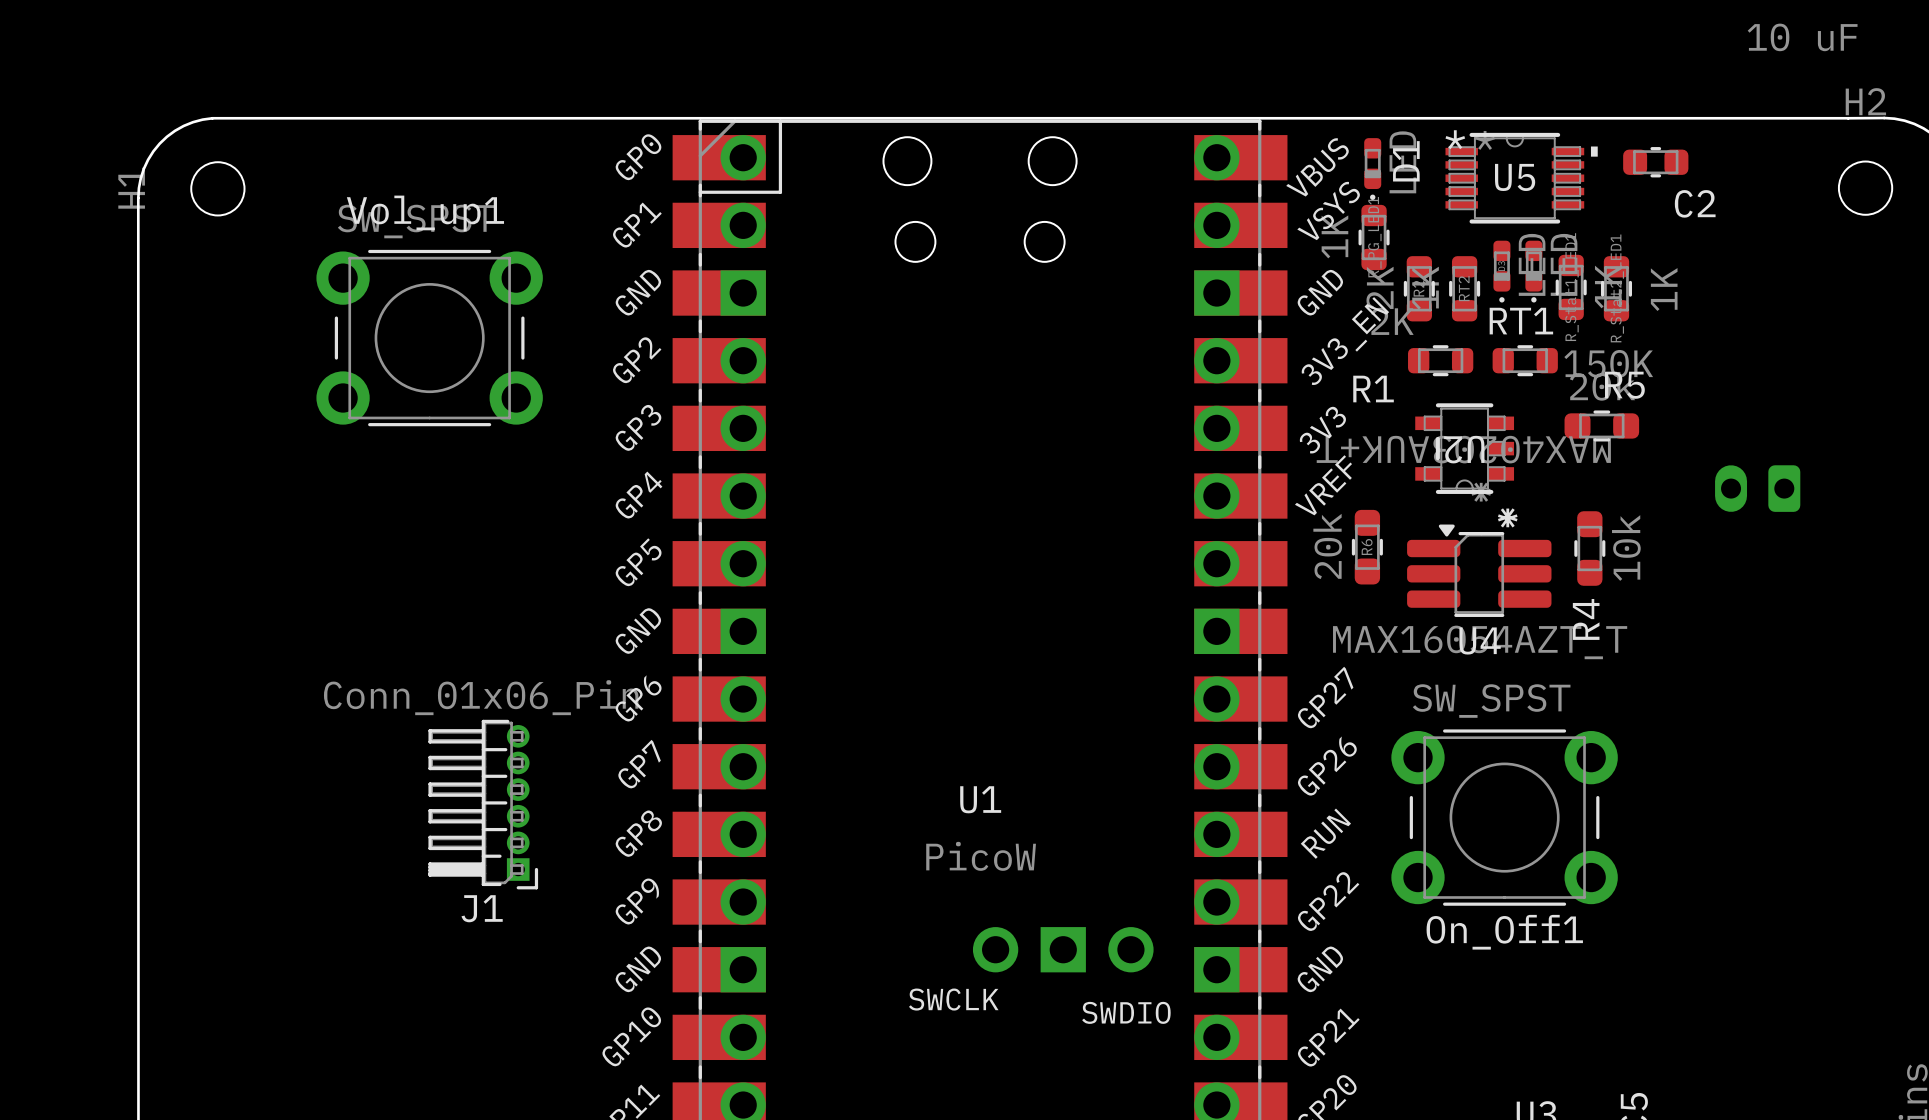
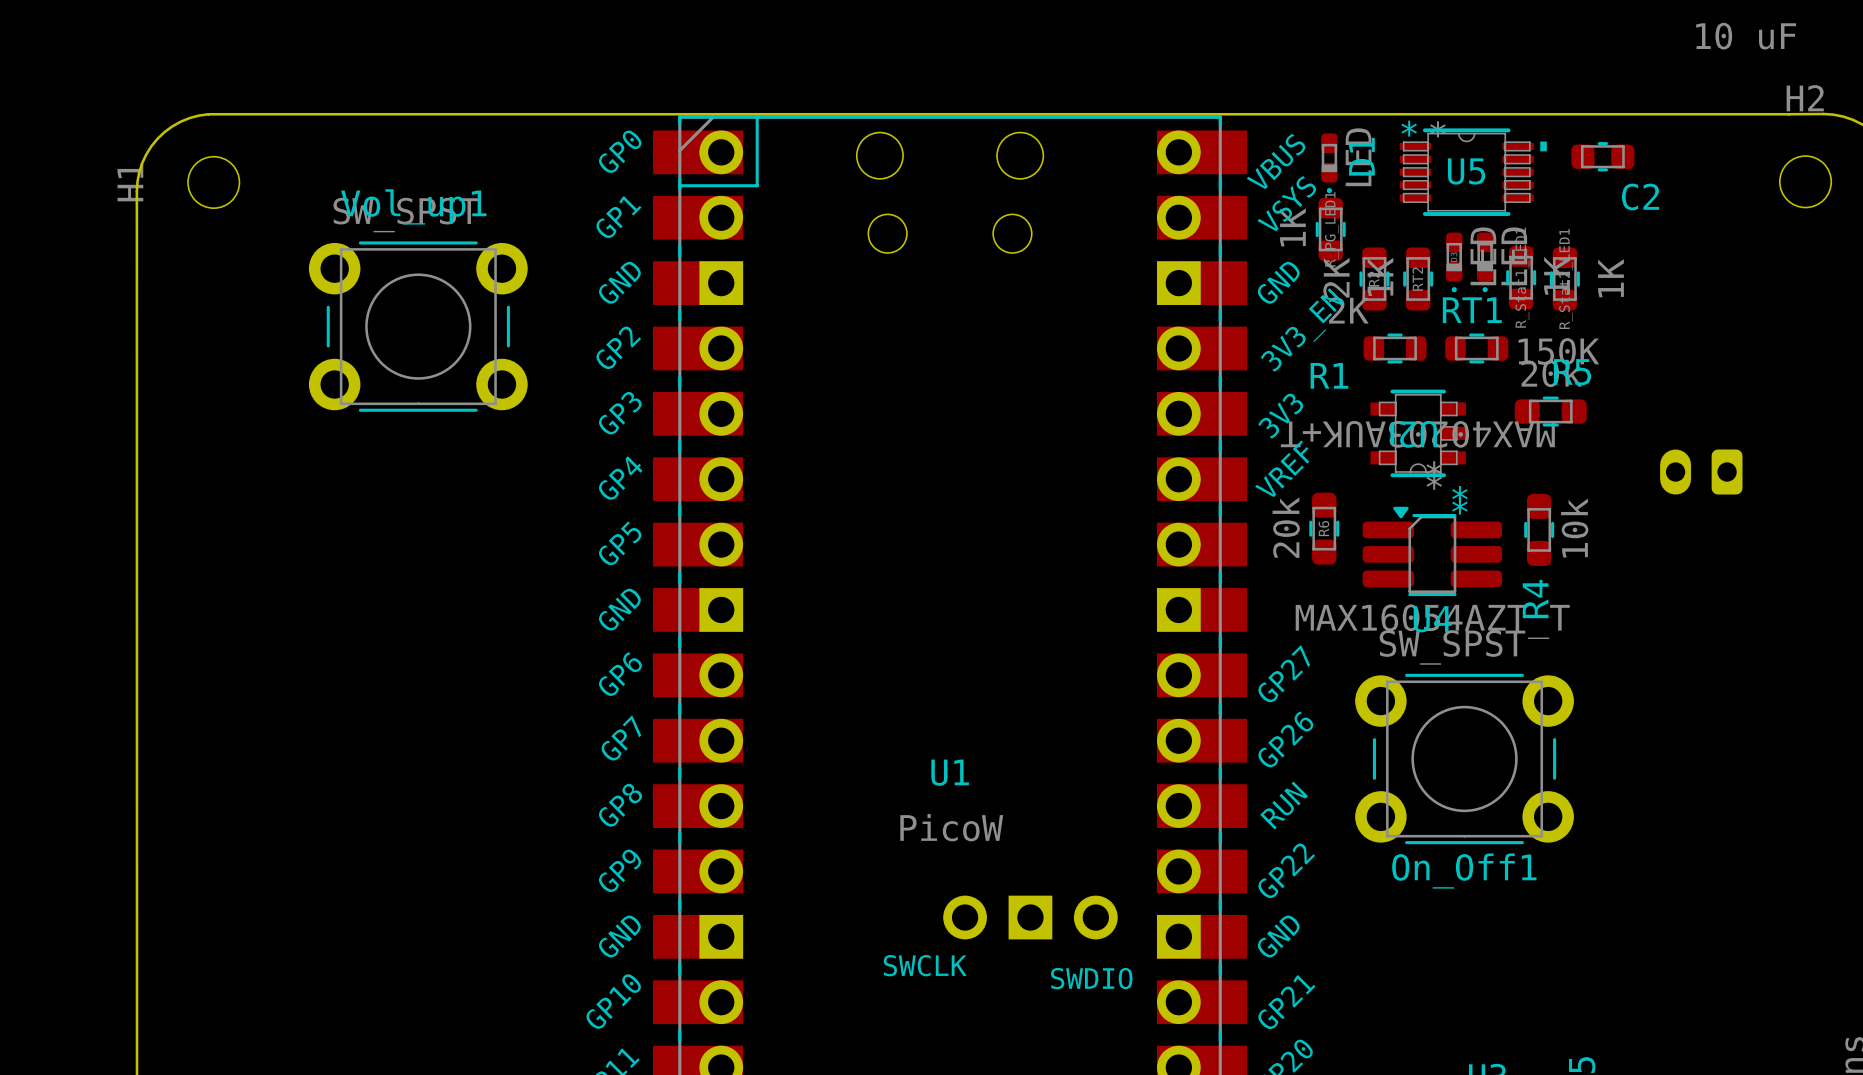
J1: Conn_01x06_Pin (483, 804) -> none
On_Off1 position: (1504, 817) -> (1464, 758)

